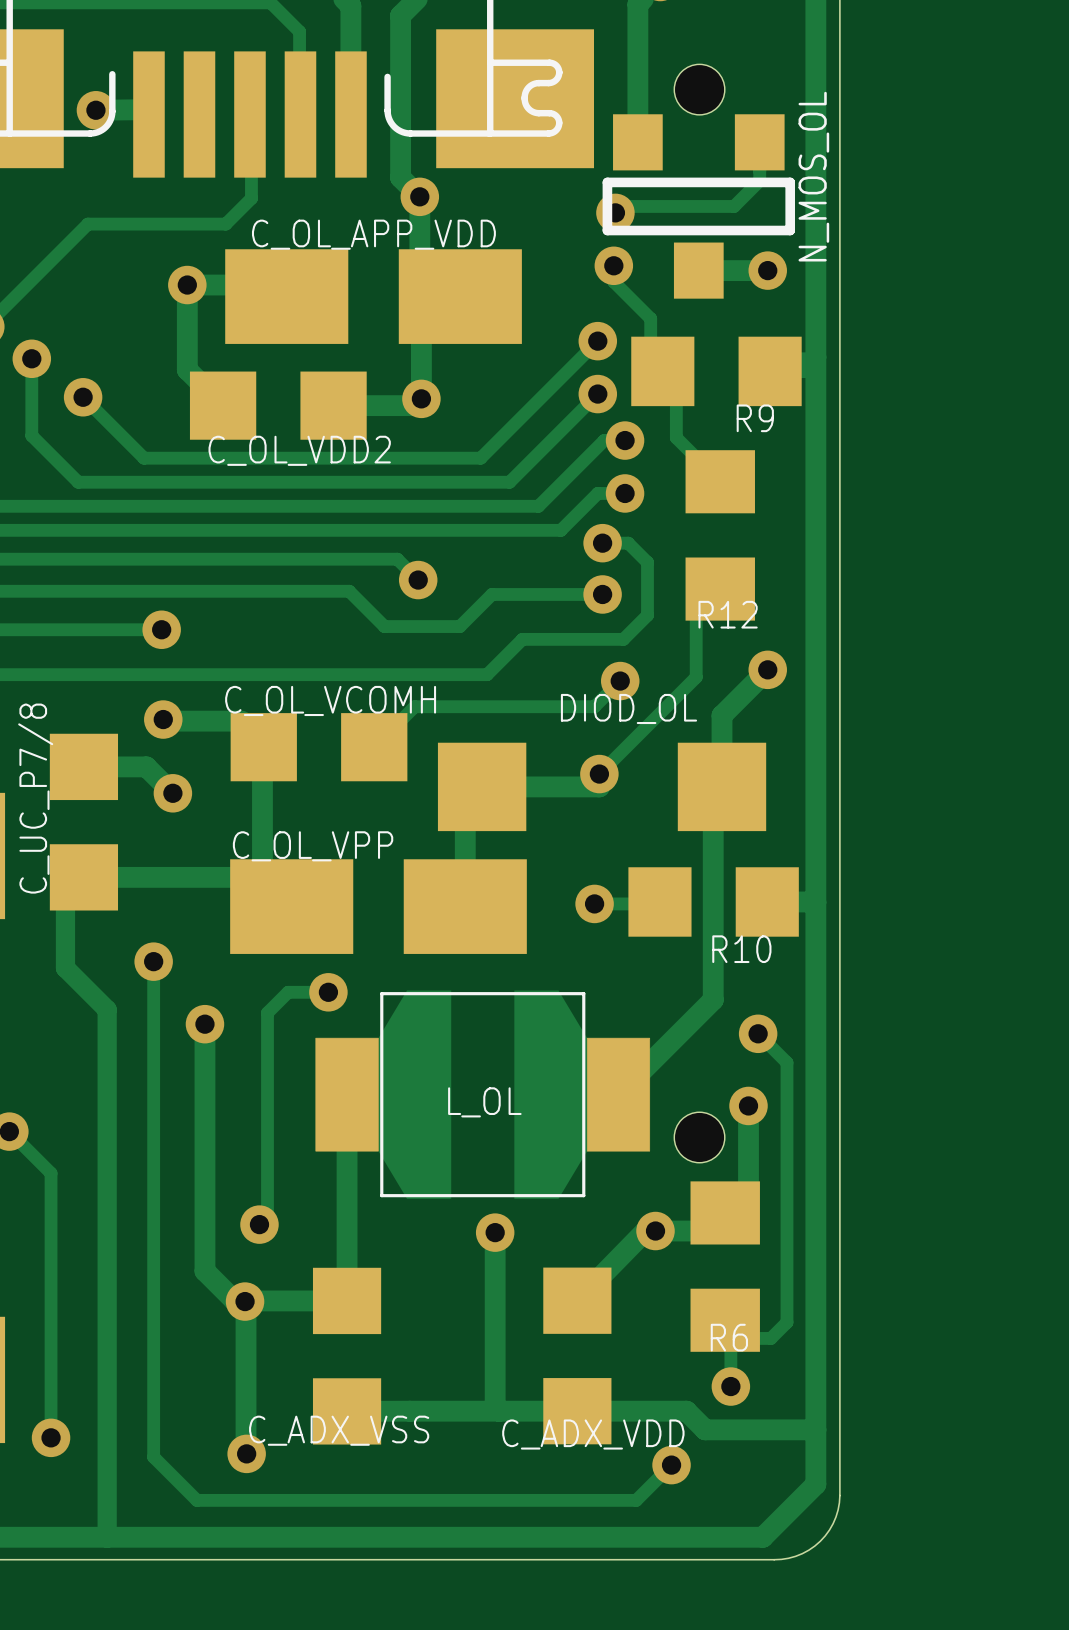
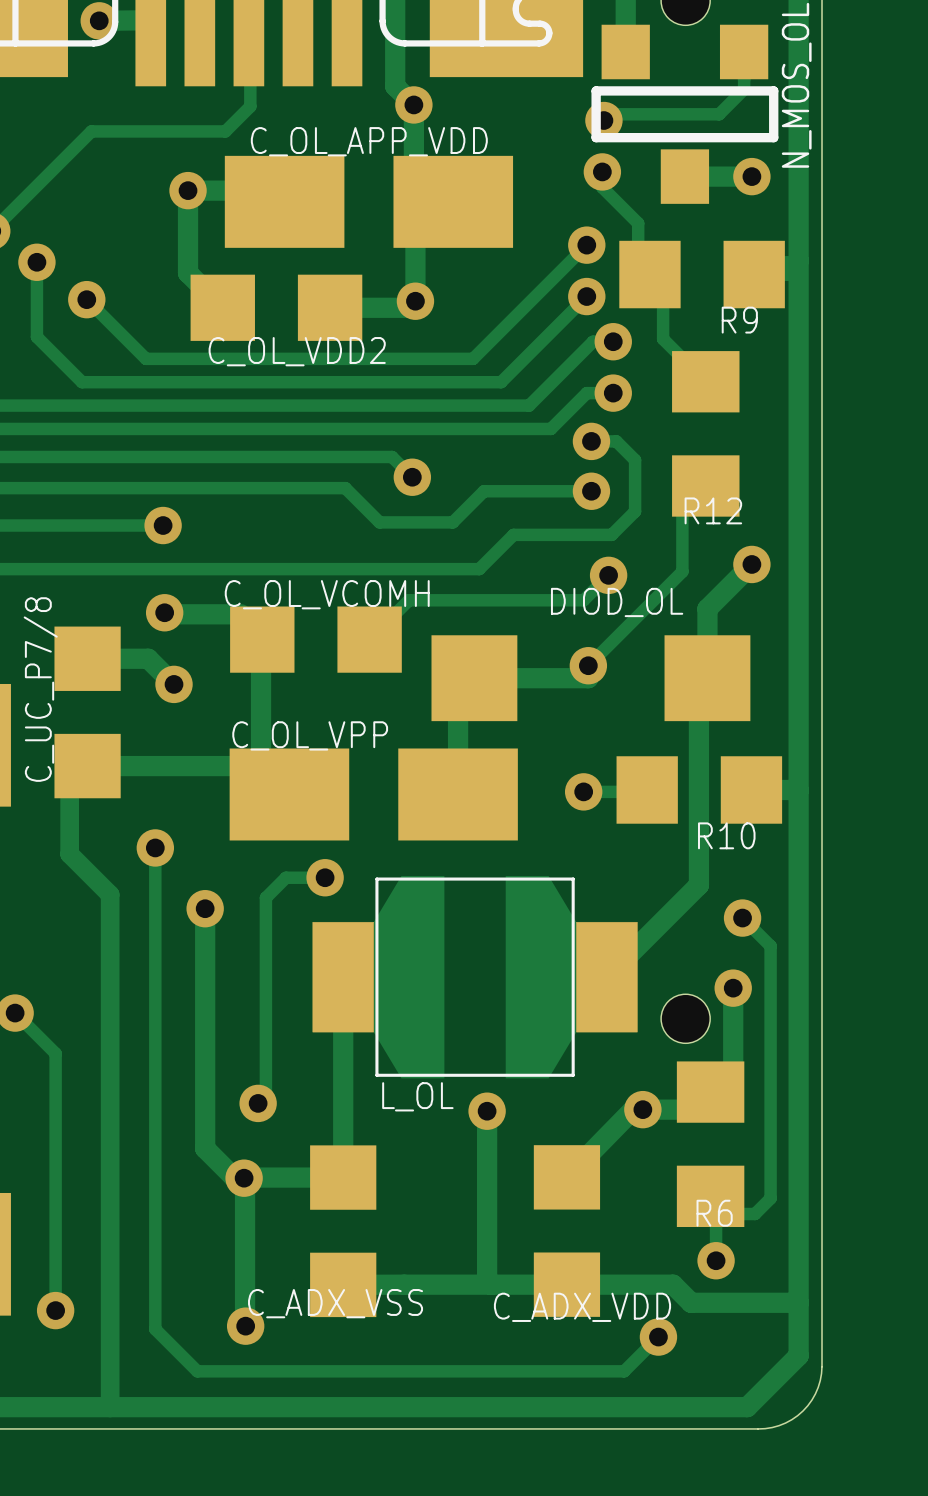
text position: L_OL (484, 1102) -> L_OL (417, 1096)

